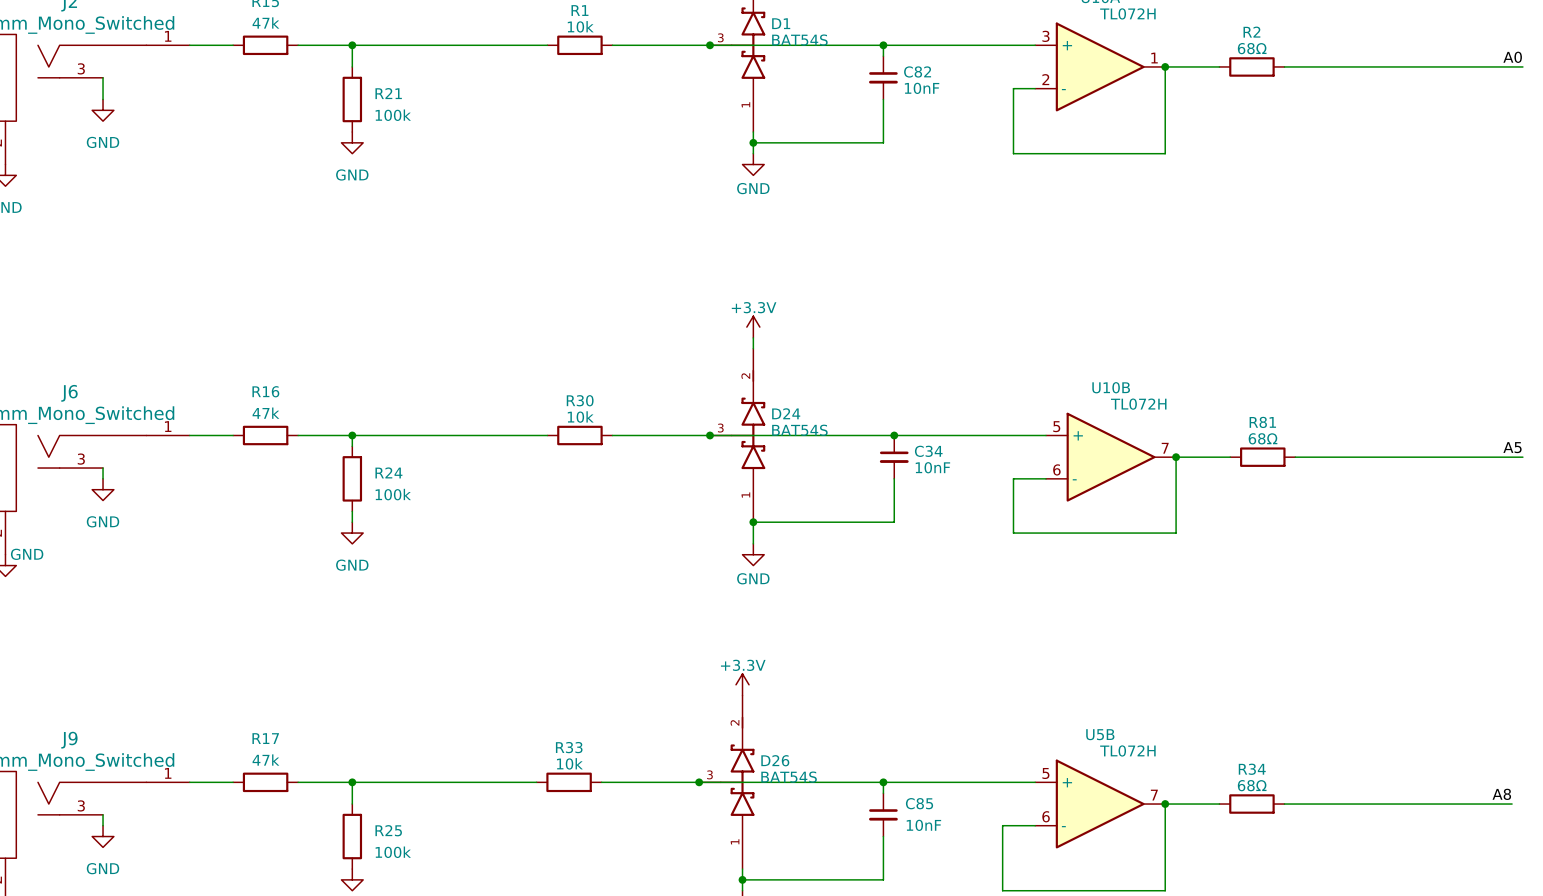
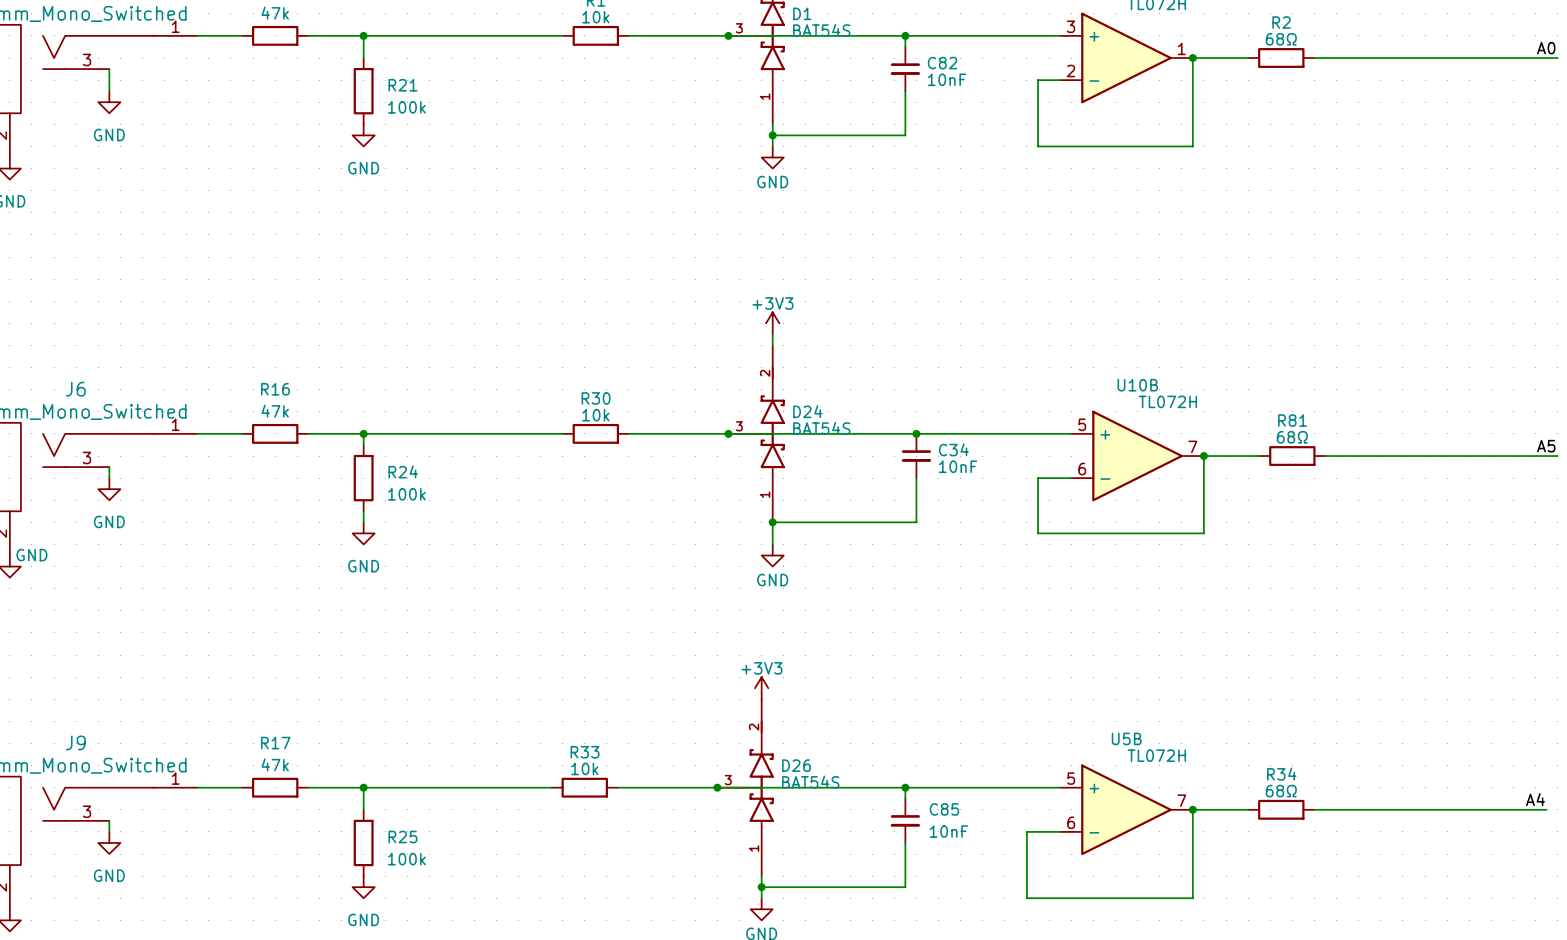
power symbol: +3.3V (753, 327) -> +3V3 (772, 323)
power symbol: +3.3V (742, 684) -> +3V3 (761, 688)
label: A8 (1501, 794) -> A4 (1535, 799)

